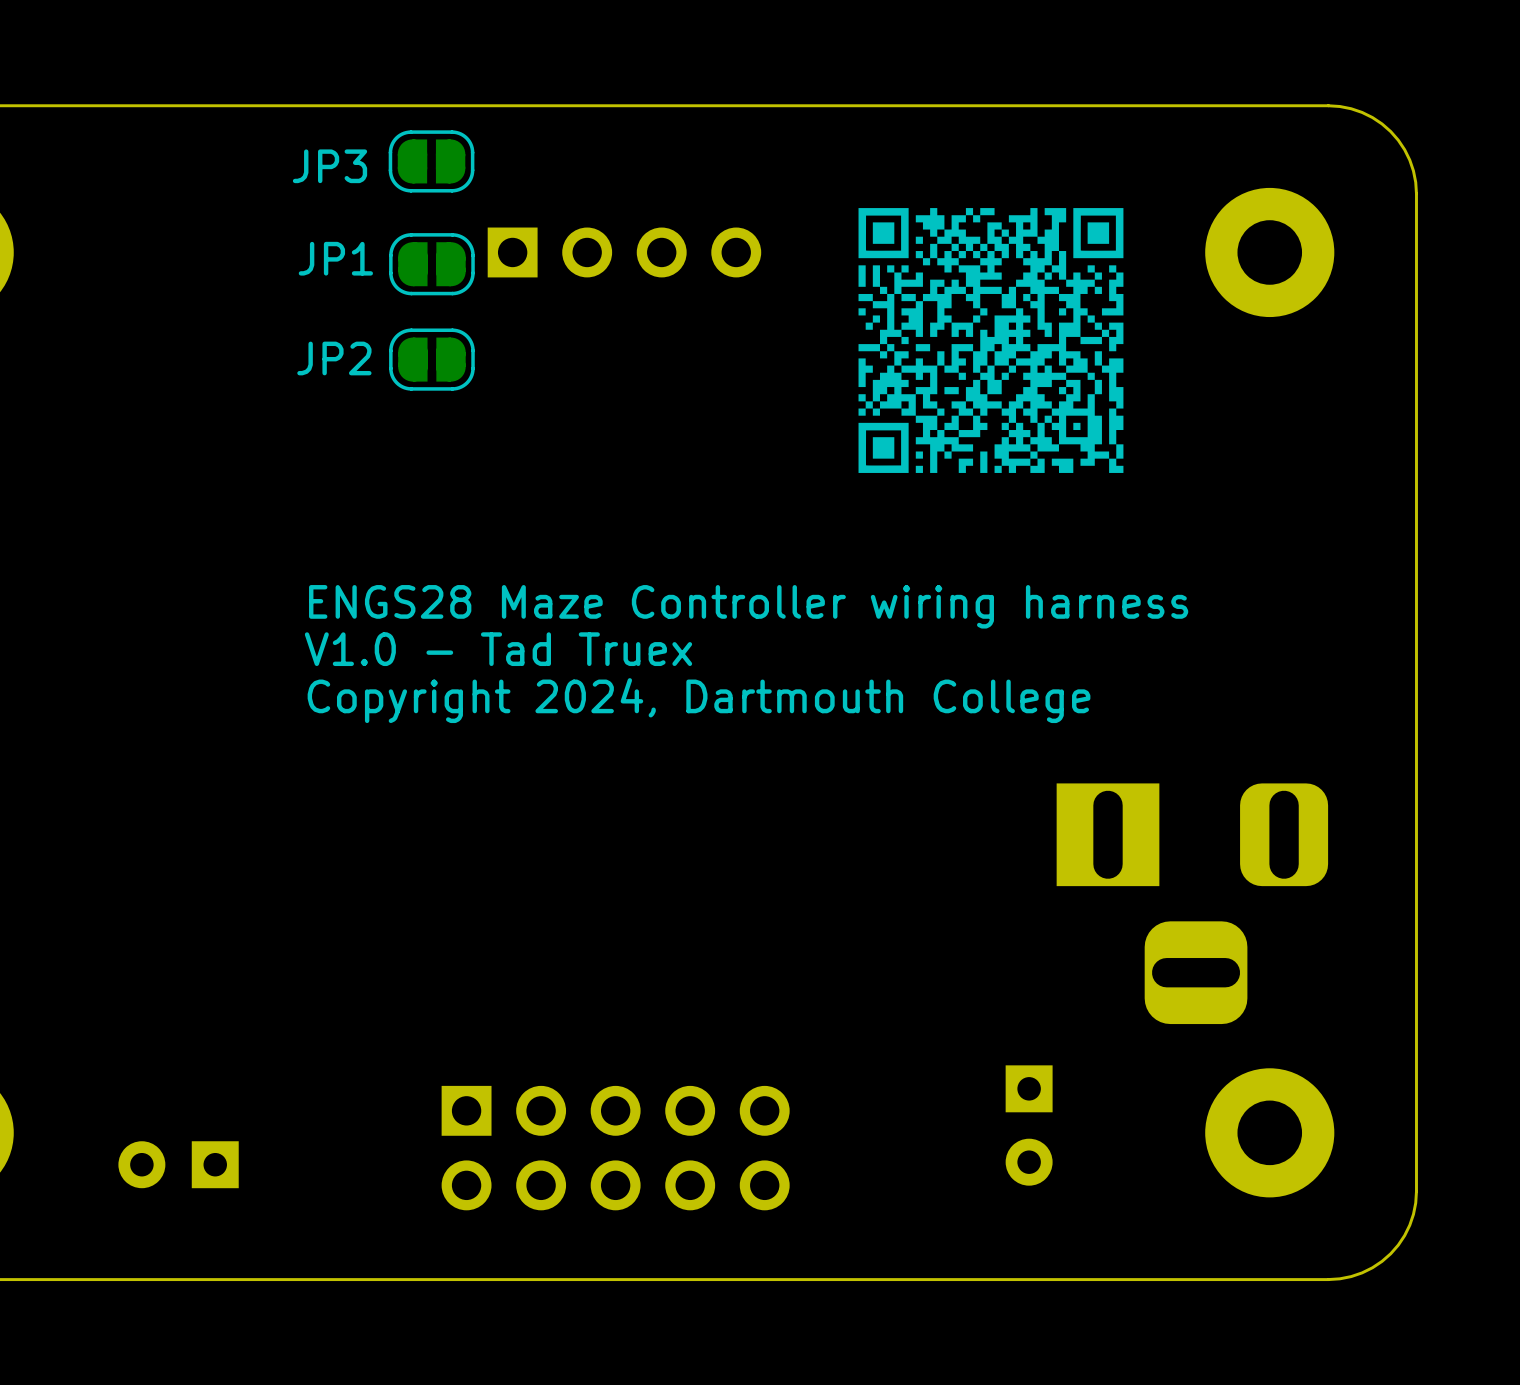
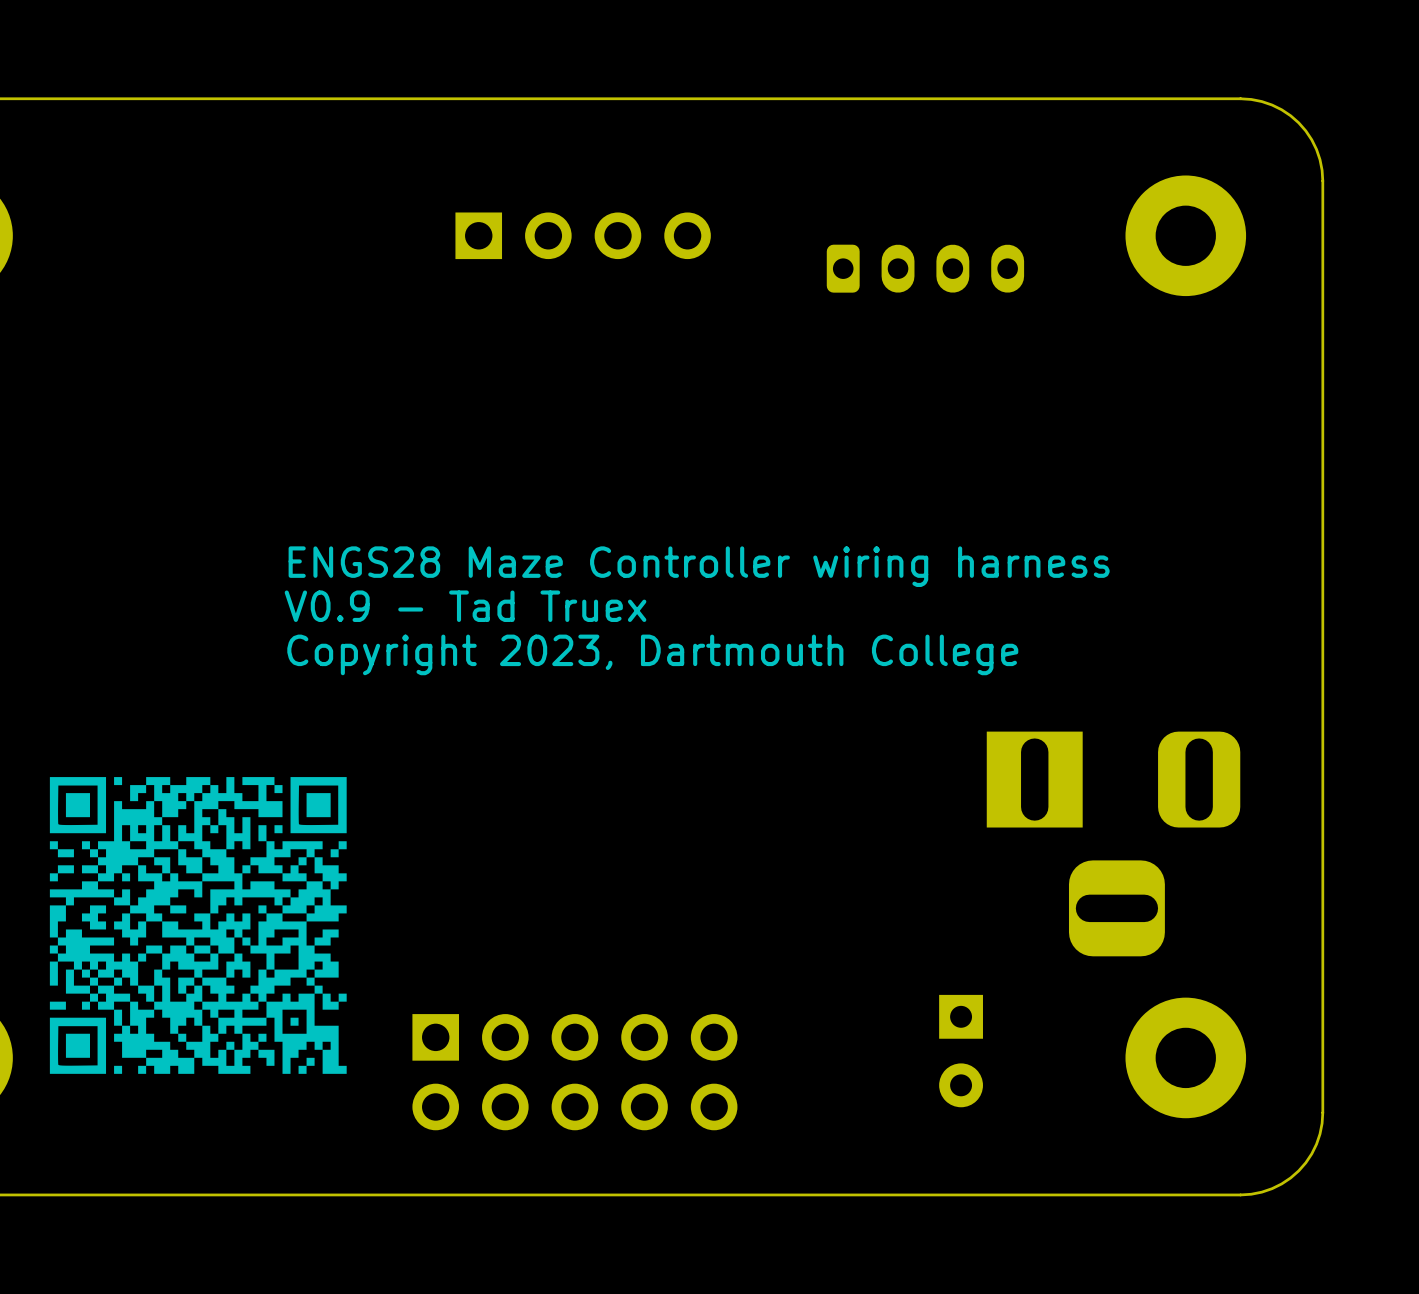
JP3: (431, 161) -> none
drawing: [858, 208, 1124, 473] -> none
JP1: (431, 264) -> none
part: none -> (925, 268)
JP2: (431, 359) -> none
text: V1.0 - Tad Truex (498, 649) -> V0.9 - Tad Truex (465, 606)
text: Copyright 2024, Dartmouth College (699, 700) -> Copyright 2023, Dartmouth College (652, 654)
drawing: none -> [49, 777, 347, 1074]
part: (178, 1164) -> none

